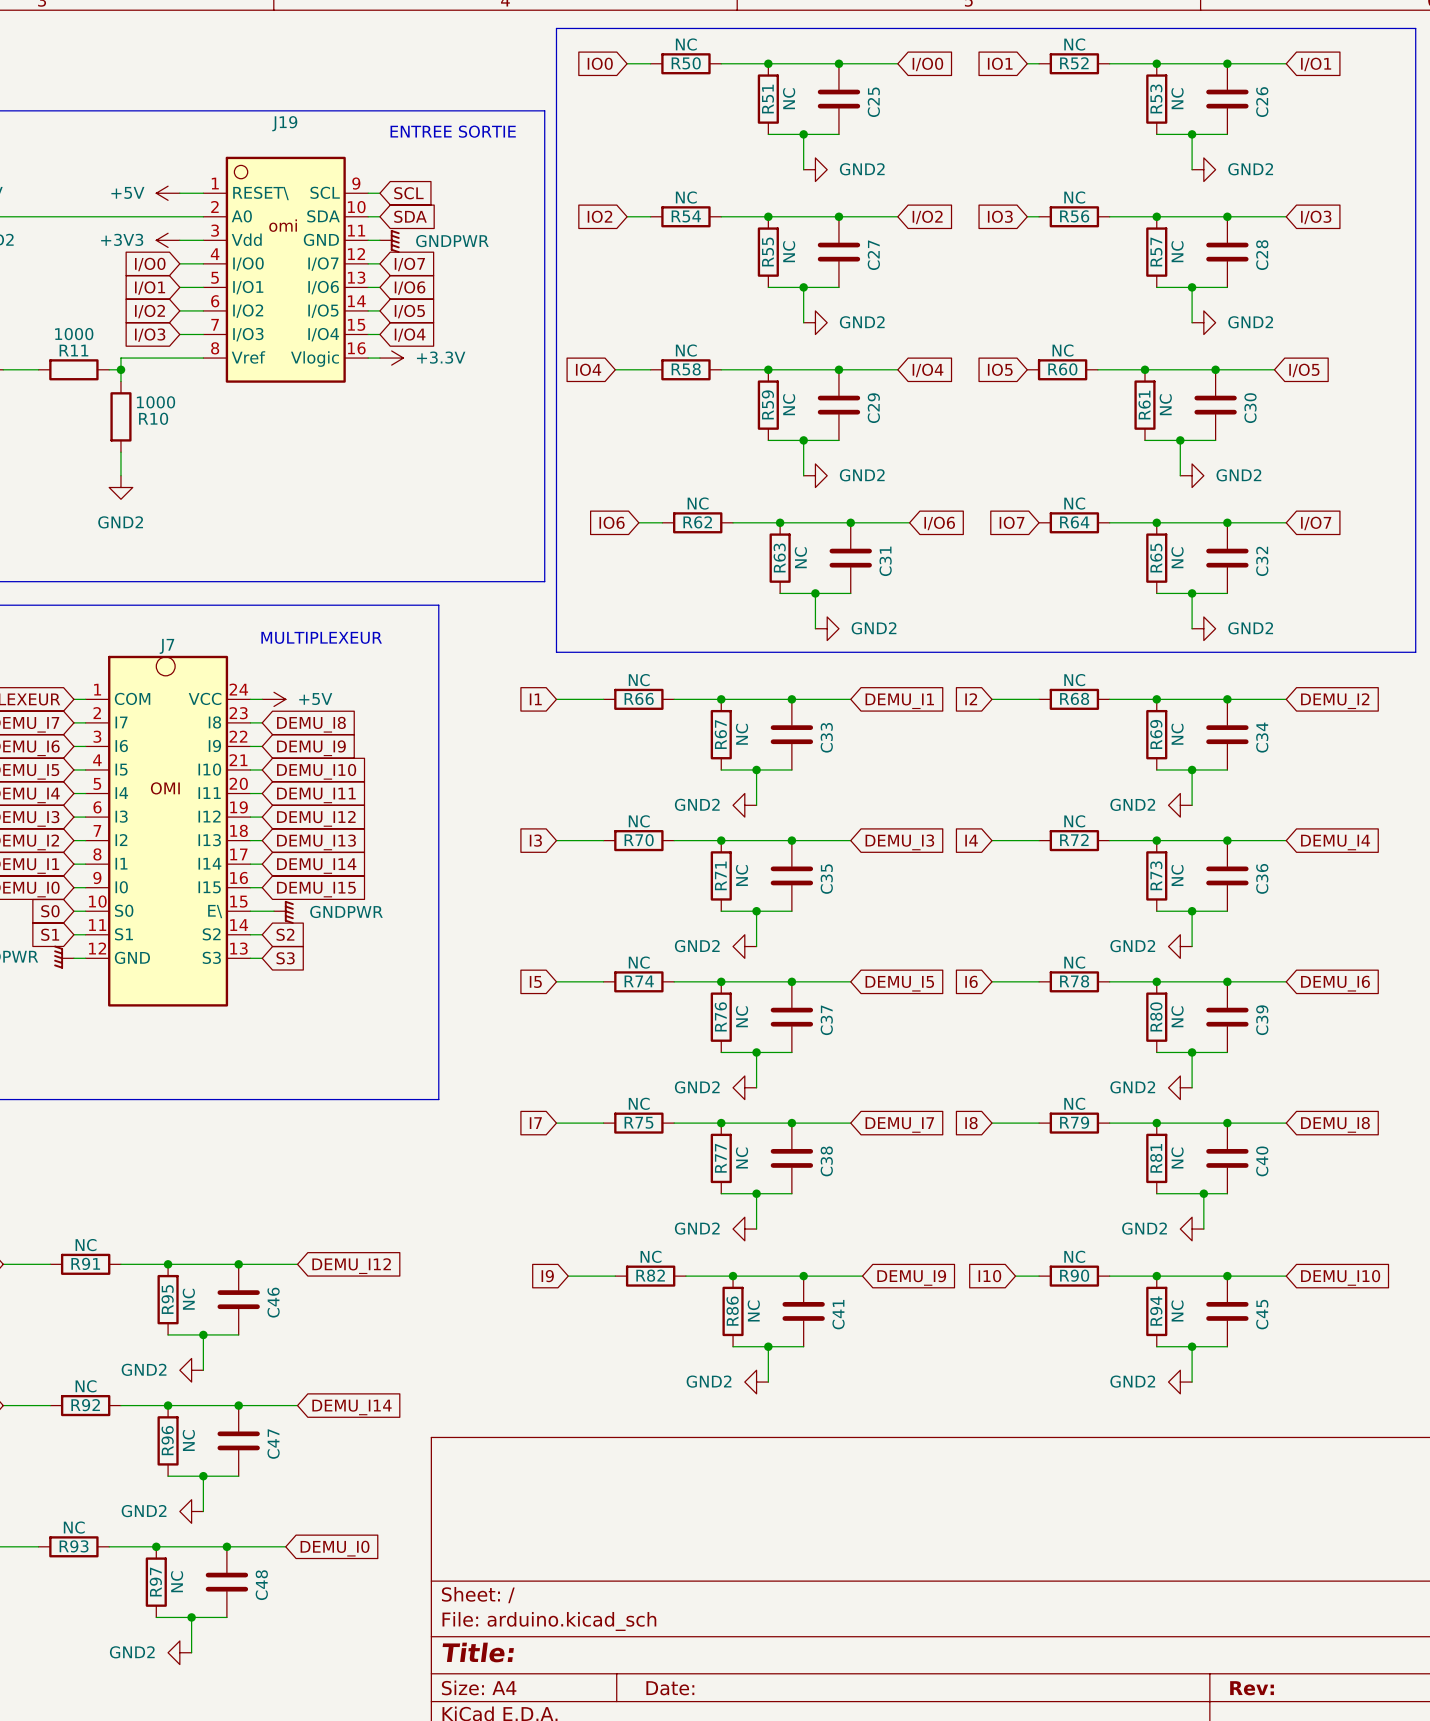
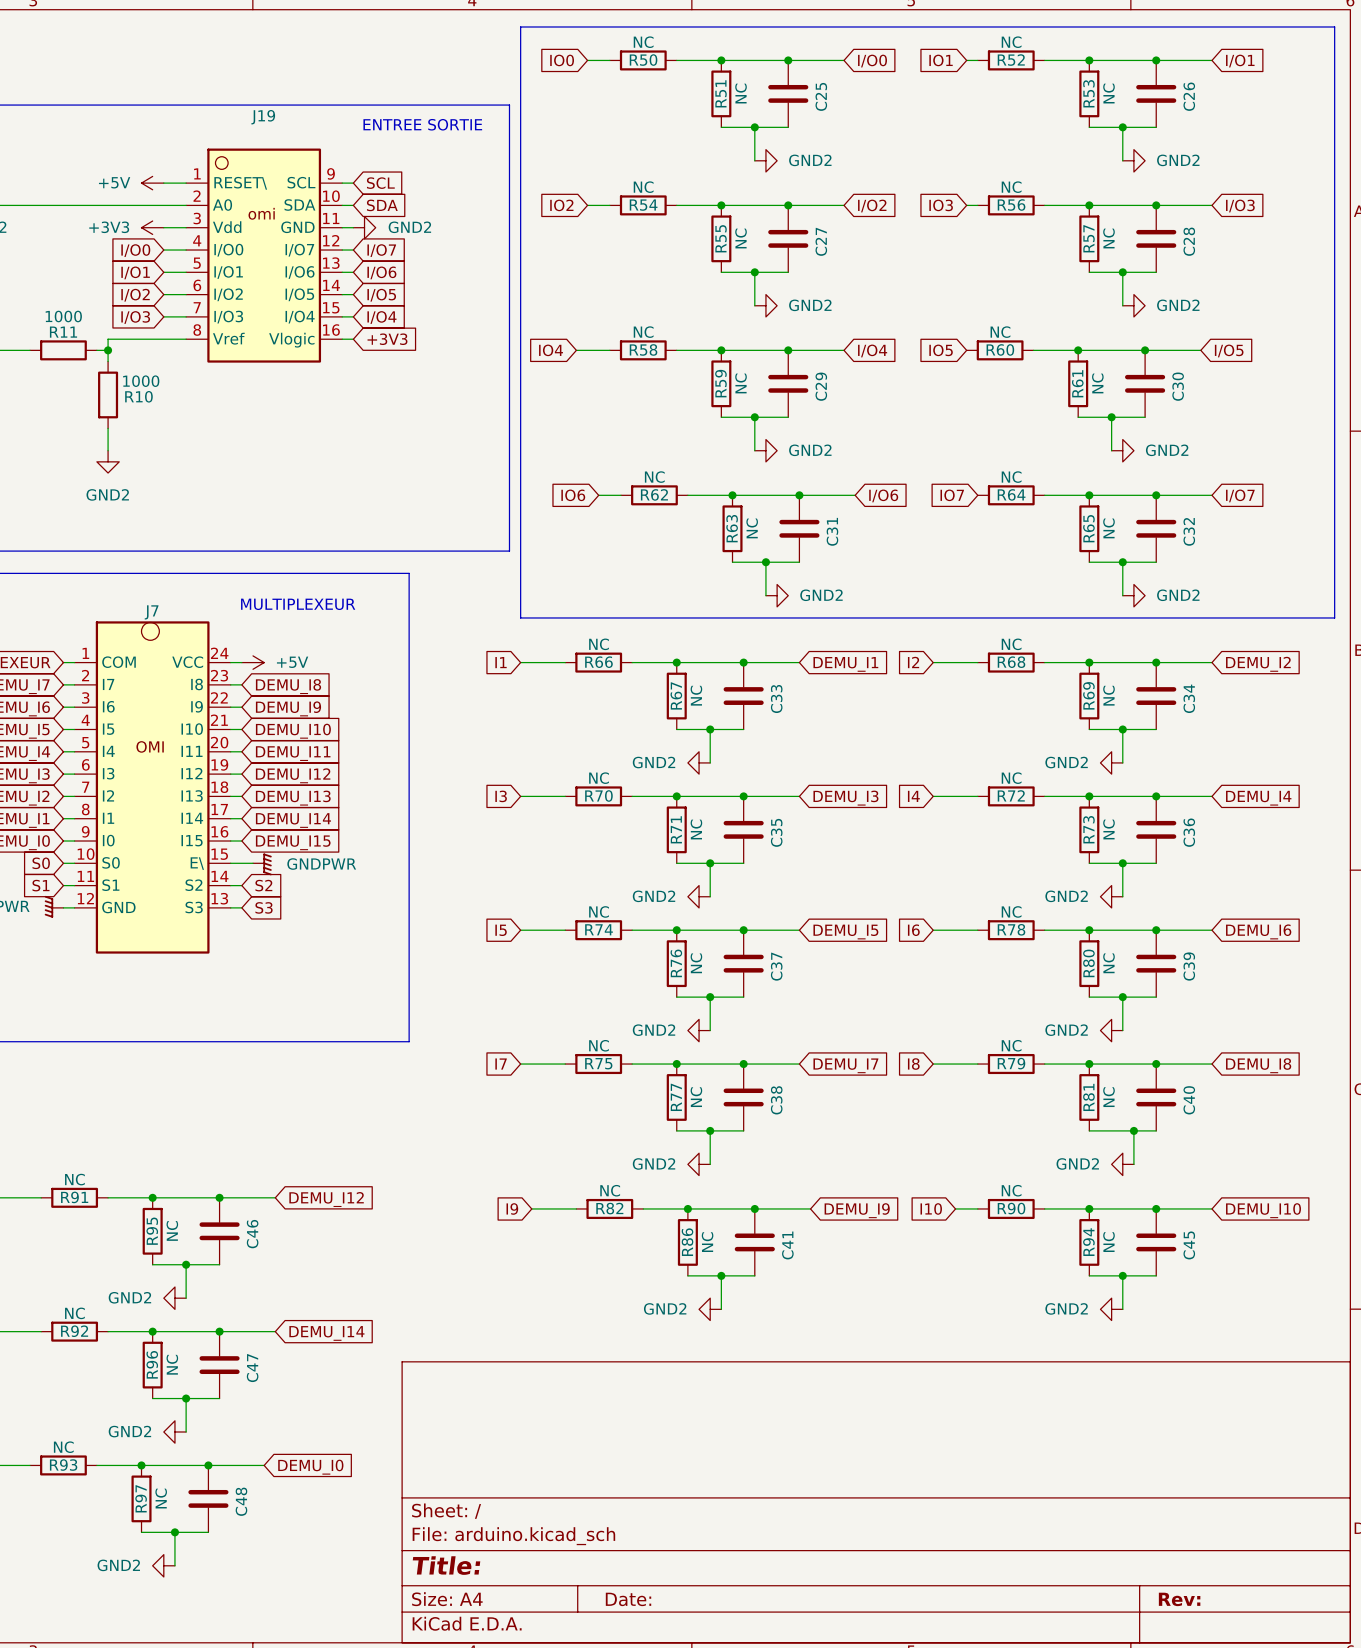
power symbol: GNDPWR (389, 241) -> GND2 (364, 227)
power symbol: +3.3V (391, 358) -> none
global label: none -> +3V3 (387, 339)

